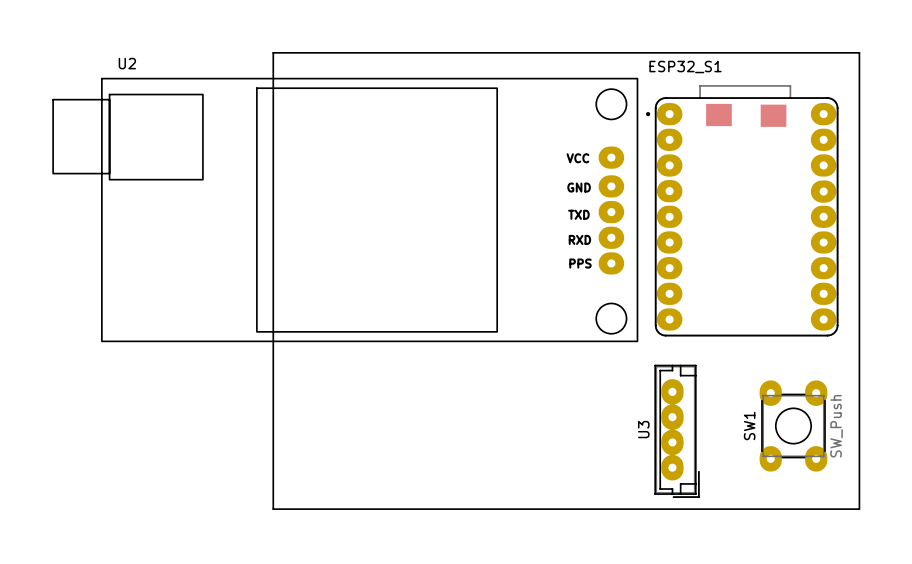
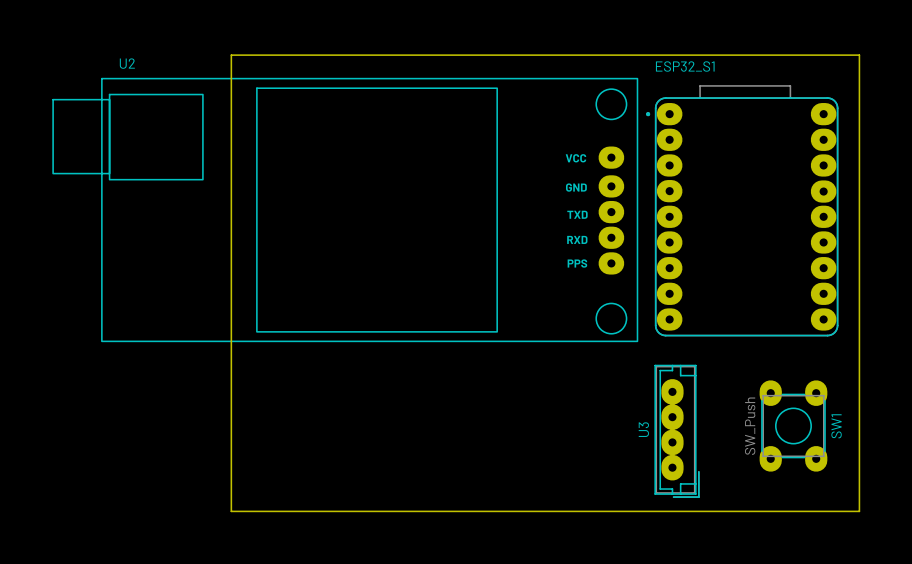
board edge: (859, 55) (859, 52) (273, 52) (273, 509) (859, 509) -> (859, 55) (231, 55) (231, 511) (859, 511) (859, 509)
part: (718, 114) -> none
part: (773, 115) -> none
SW1 name position: SW1 (749, 426) -> SW1 (836, 426)
SW1 value position: SW_Push (836, 426) -> SW_Push (750, 426)

